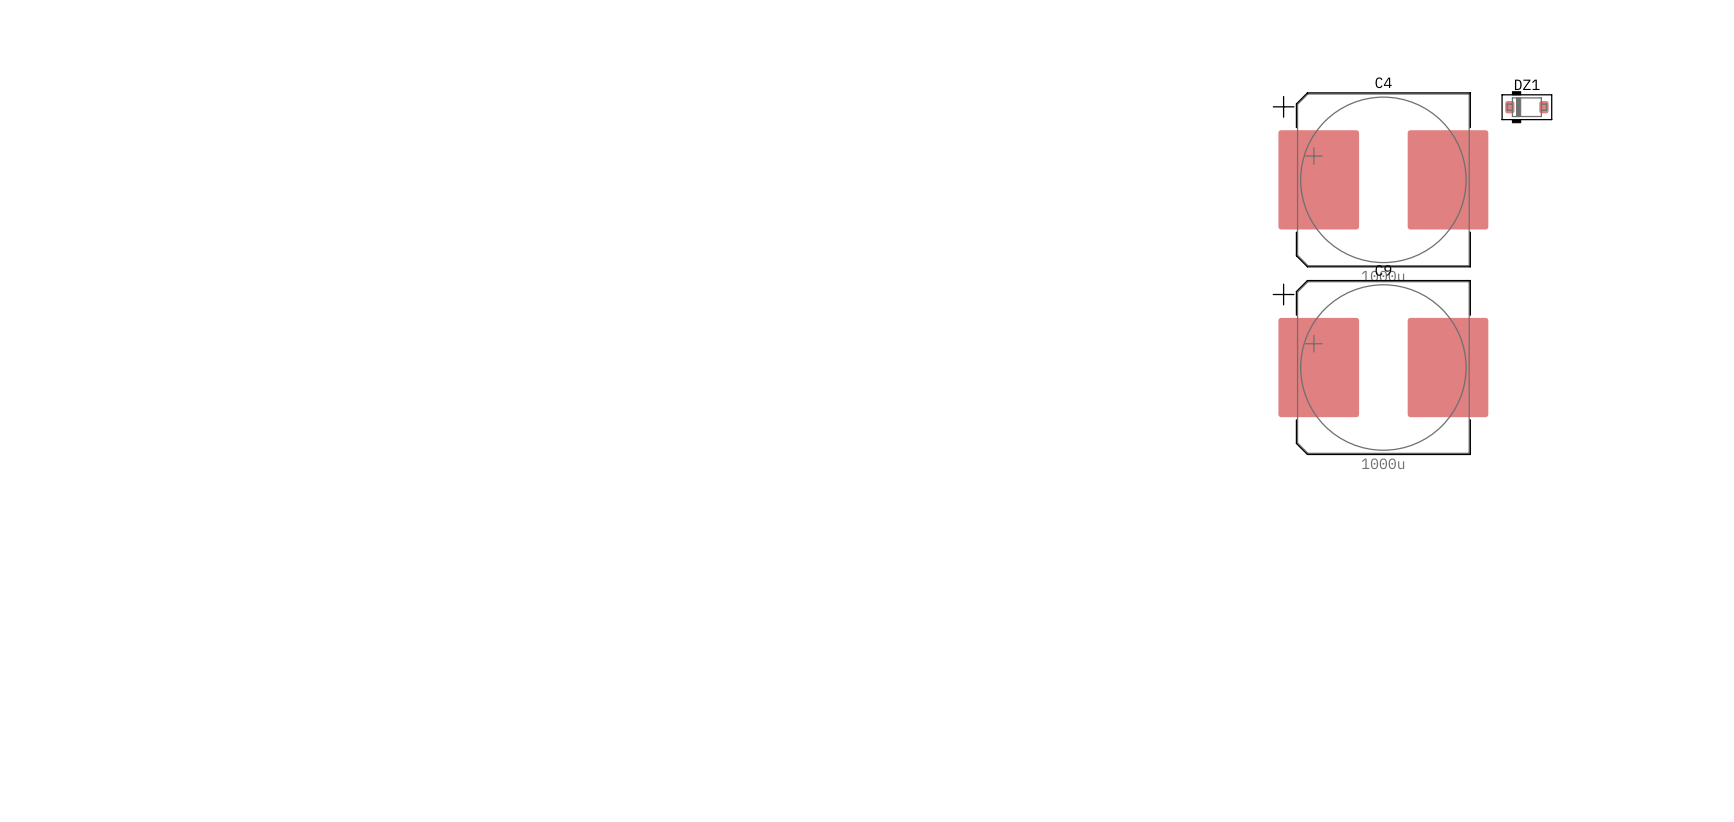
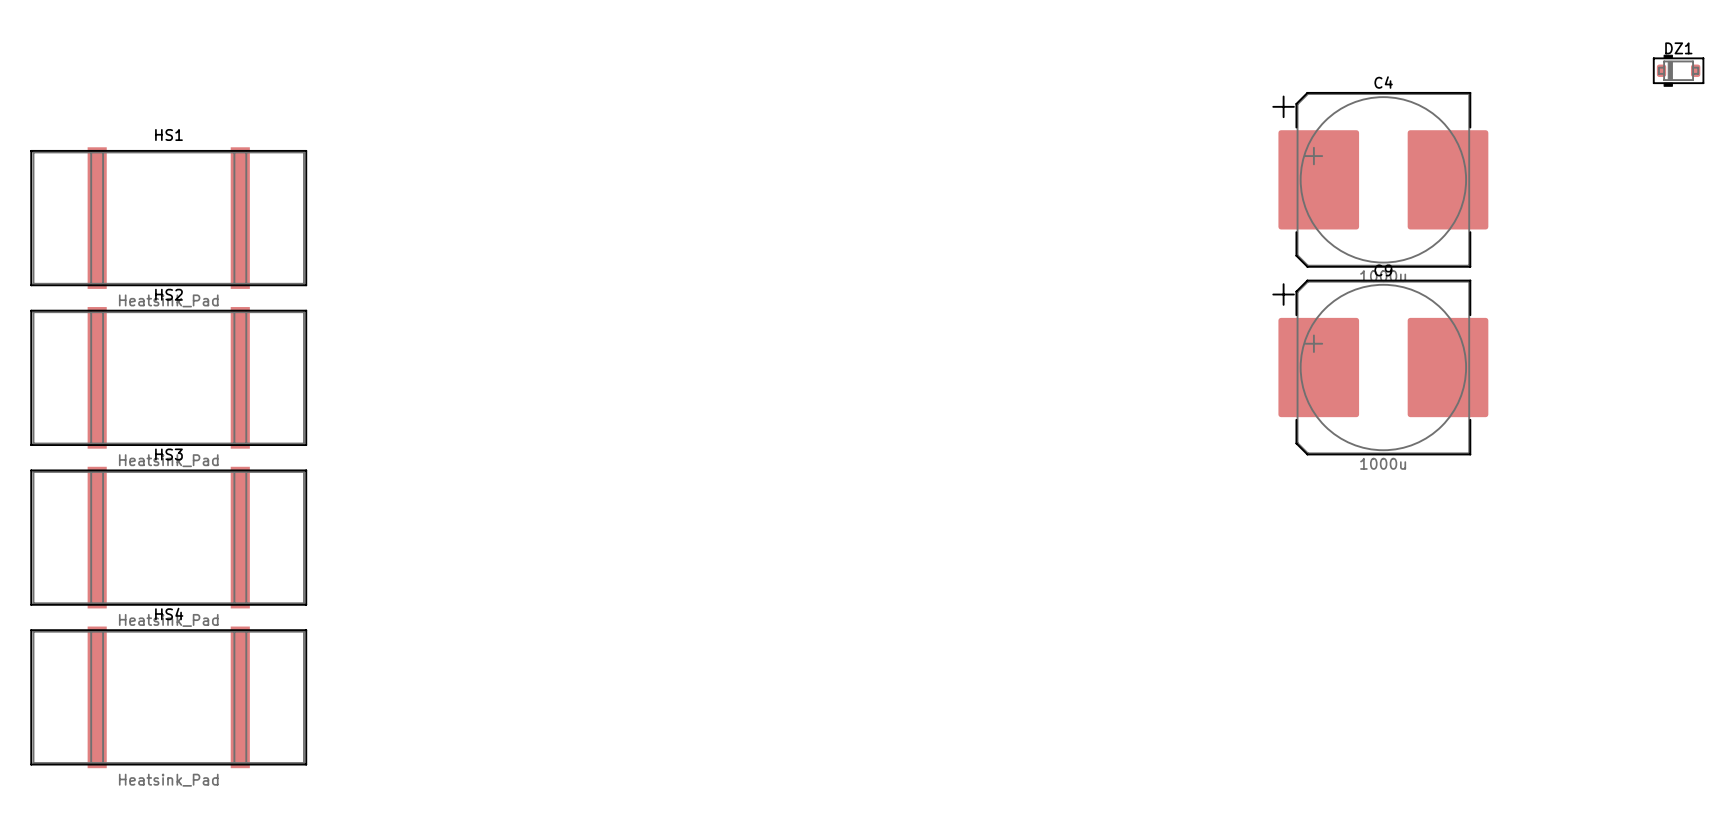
DZ1 position: (1526, 107) -> (1678, 70)
HS1: none -> Heatsink_Pad (168, 218)
HS2: none -> Heatsink_Pad (168, 377)
HS3: none -> Heatsink_Pad (168, 537)
HS4: none -> Heatsink_Pad (168, 697)

